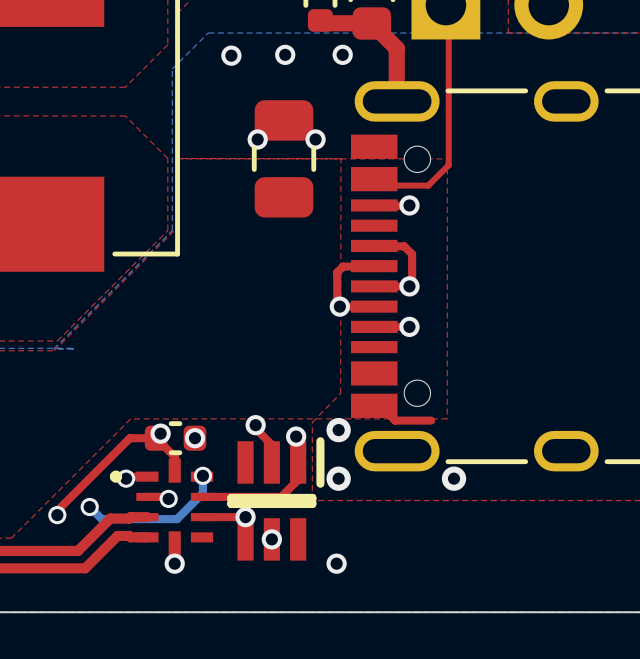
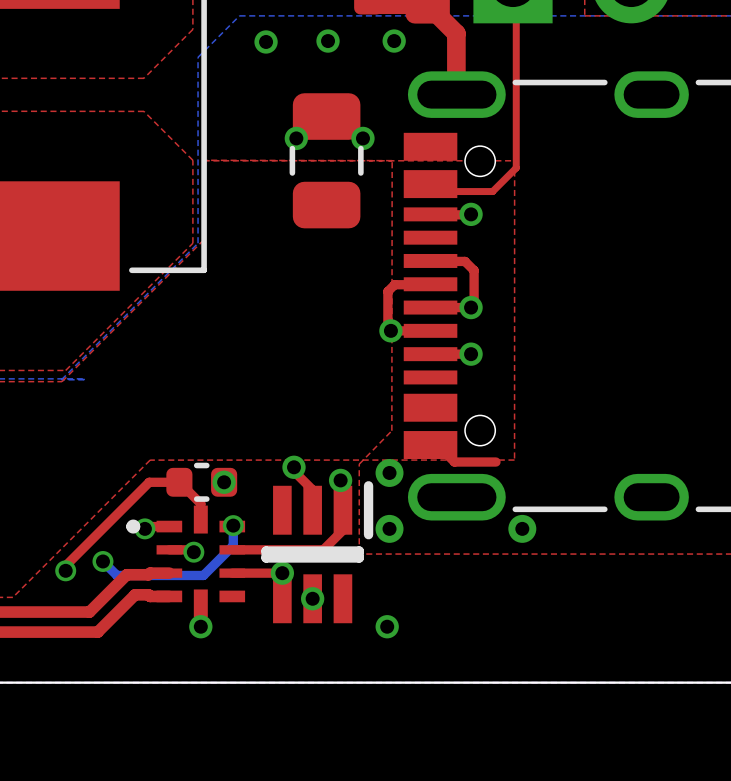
via: (160, 433) -> none

